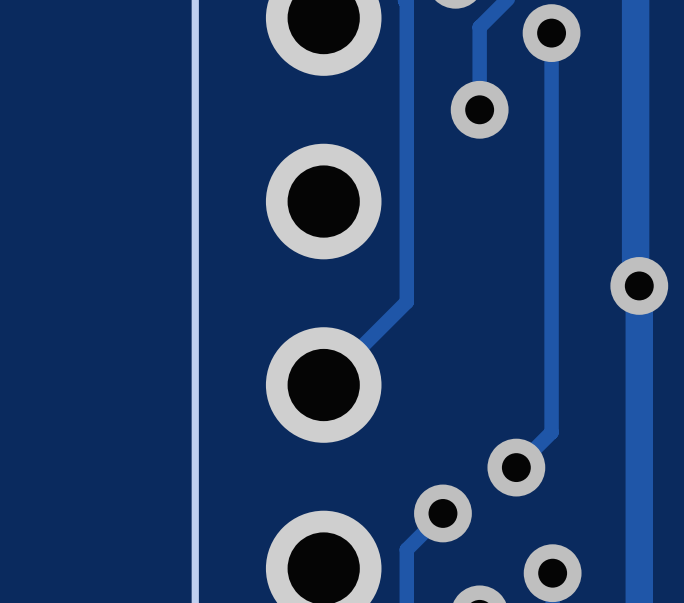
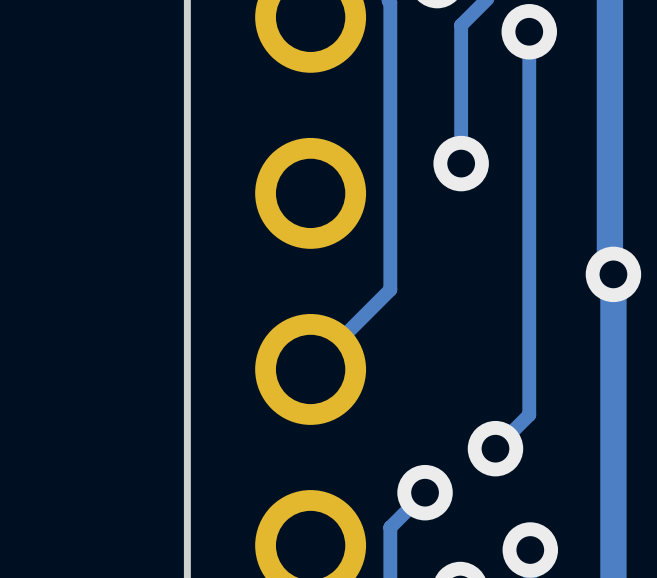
track: (479, 27) (479, 109) -> (461, 25) (461, 163)
via position: (479, 109) -> (461, 163)

